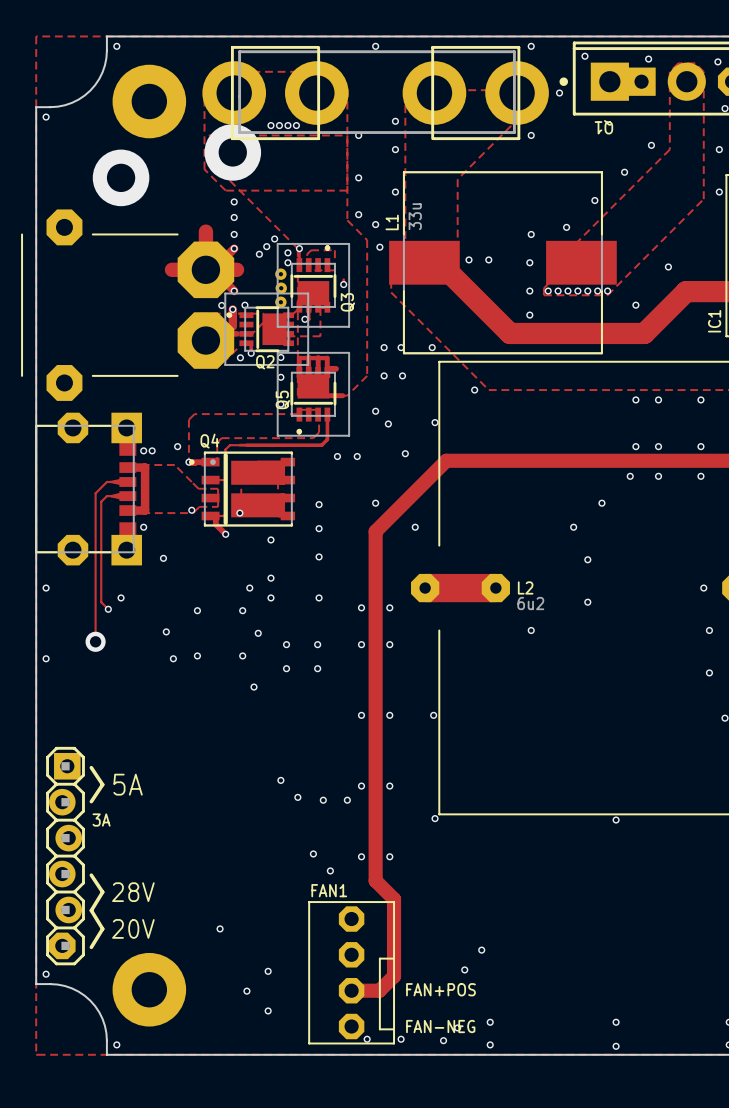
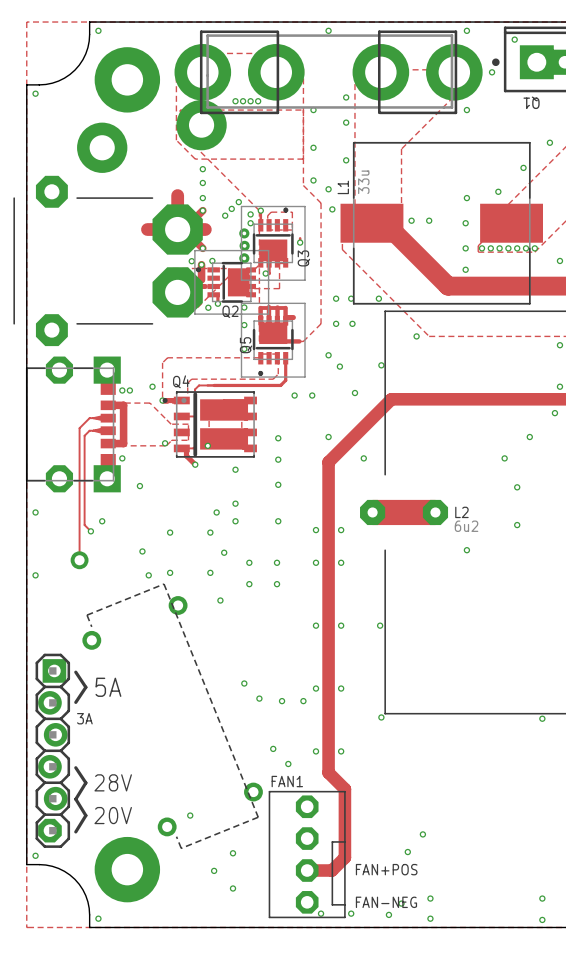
part: none -> (172, 716)

